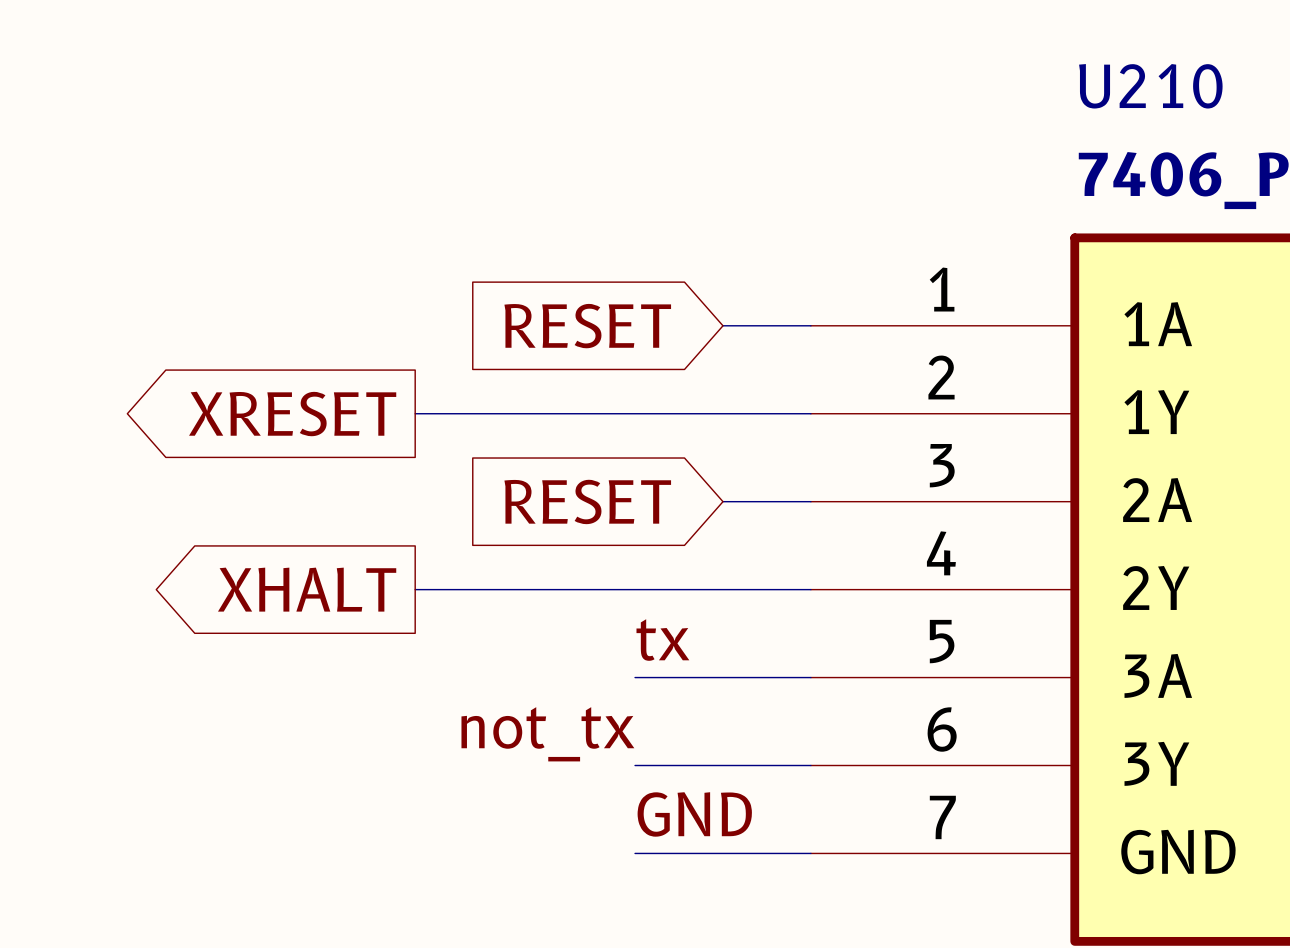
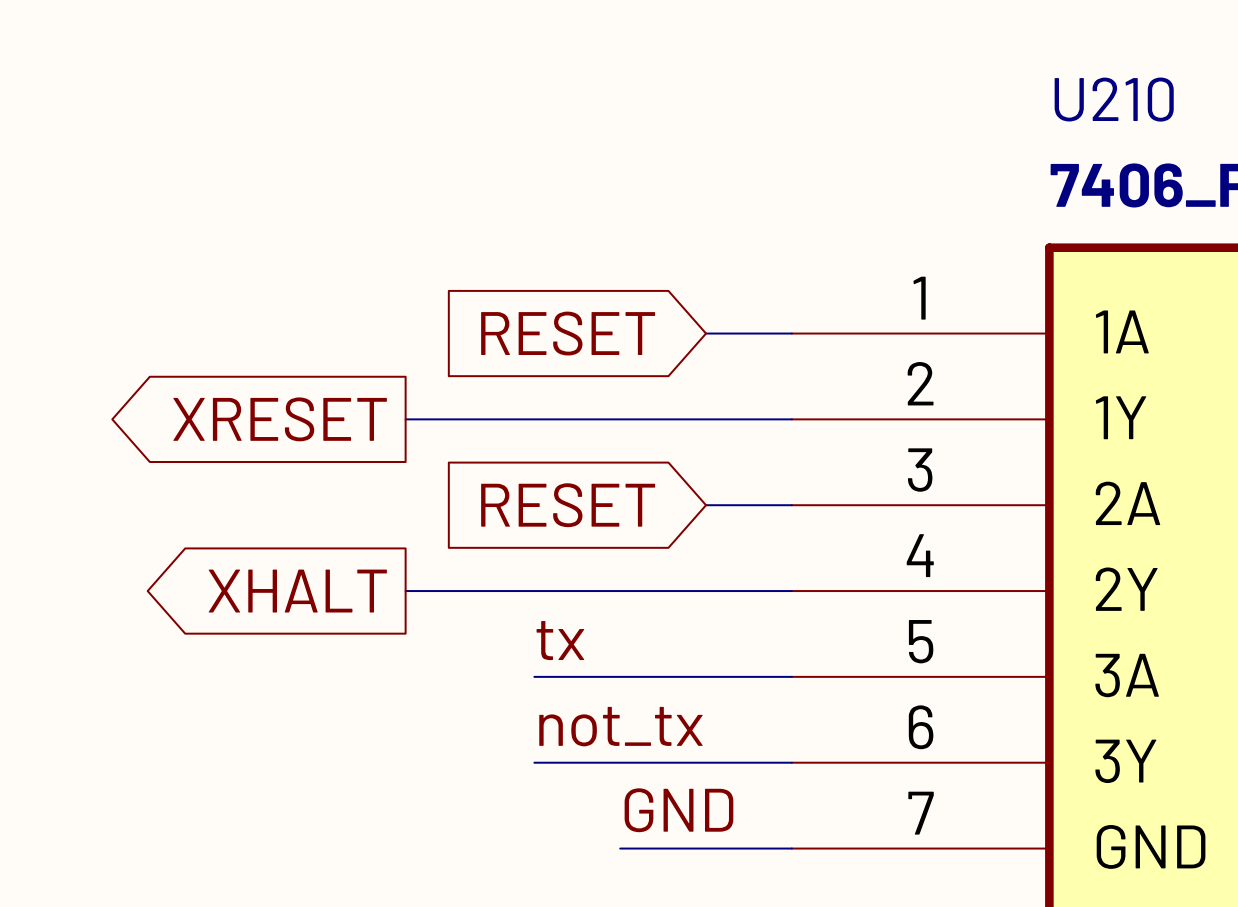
label position: tx (662, 640) -> tx (560, 640)
wire: none -> (534, 676) (620, 676)
label position: not_tx (547, 734) -> not_tx (621, 726)
wire: none -> (534, 762) (620, 762)

